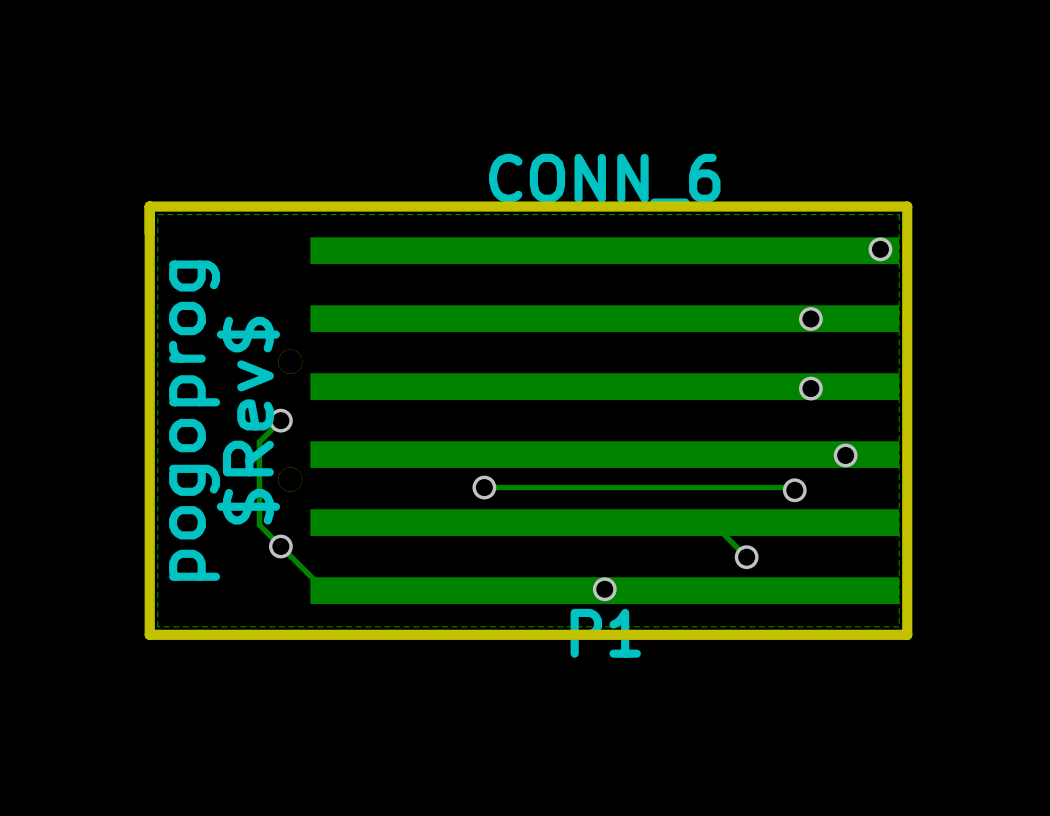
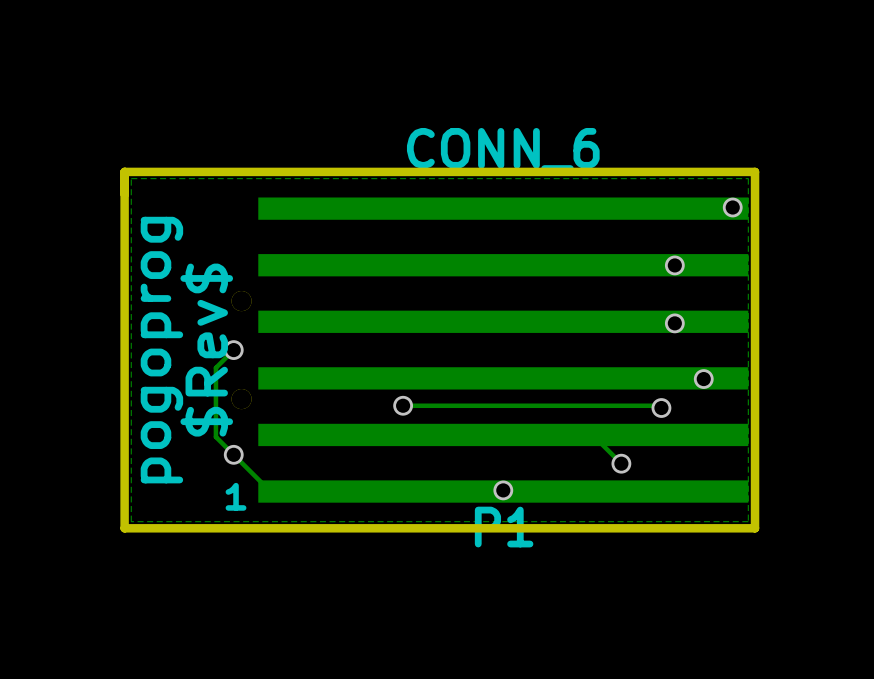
text: none -> 1 (236, 496)

